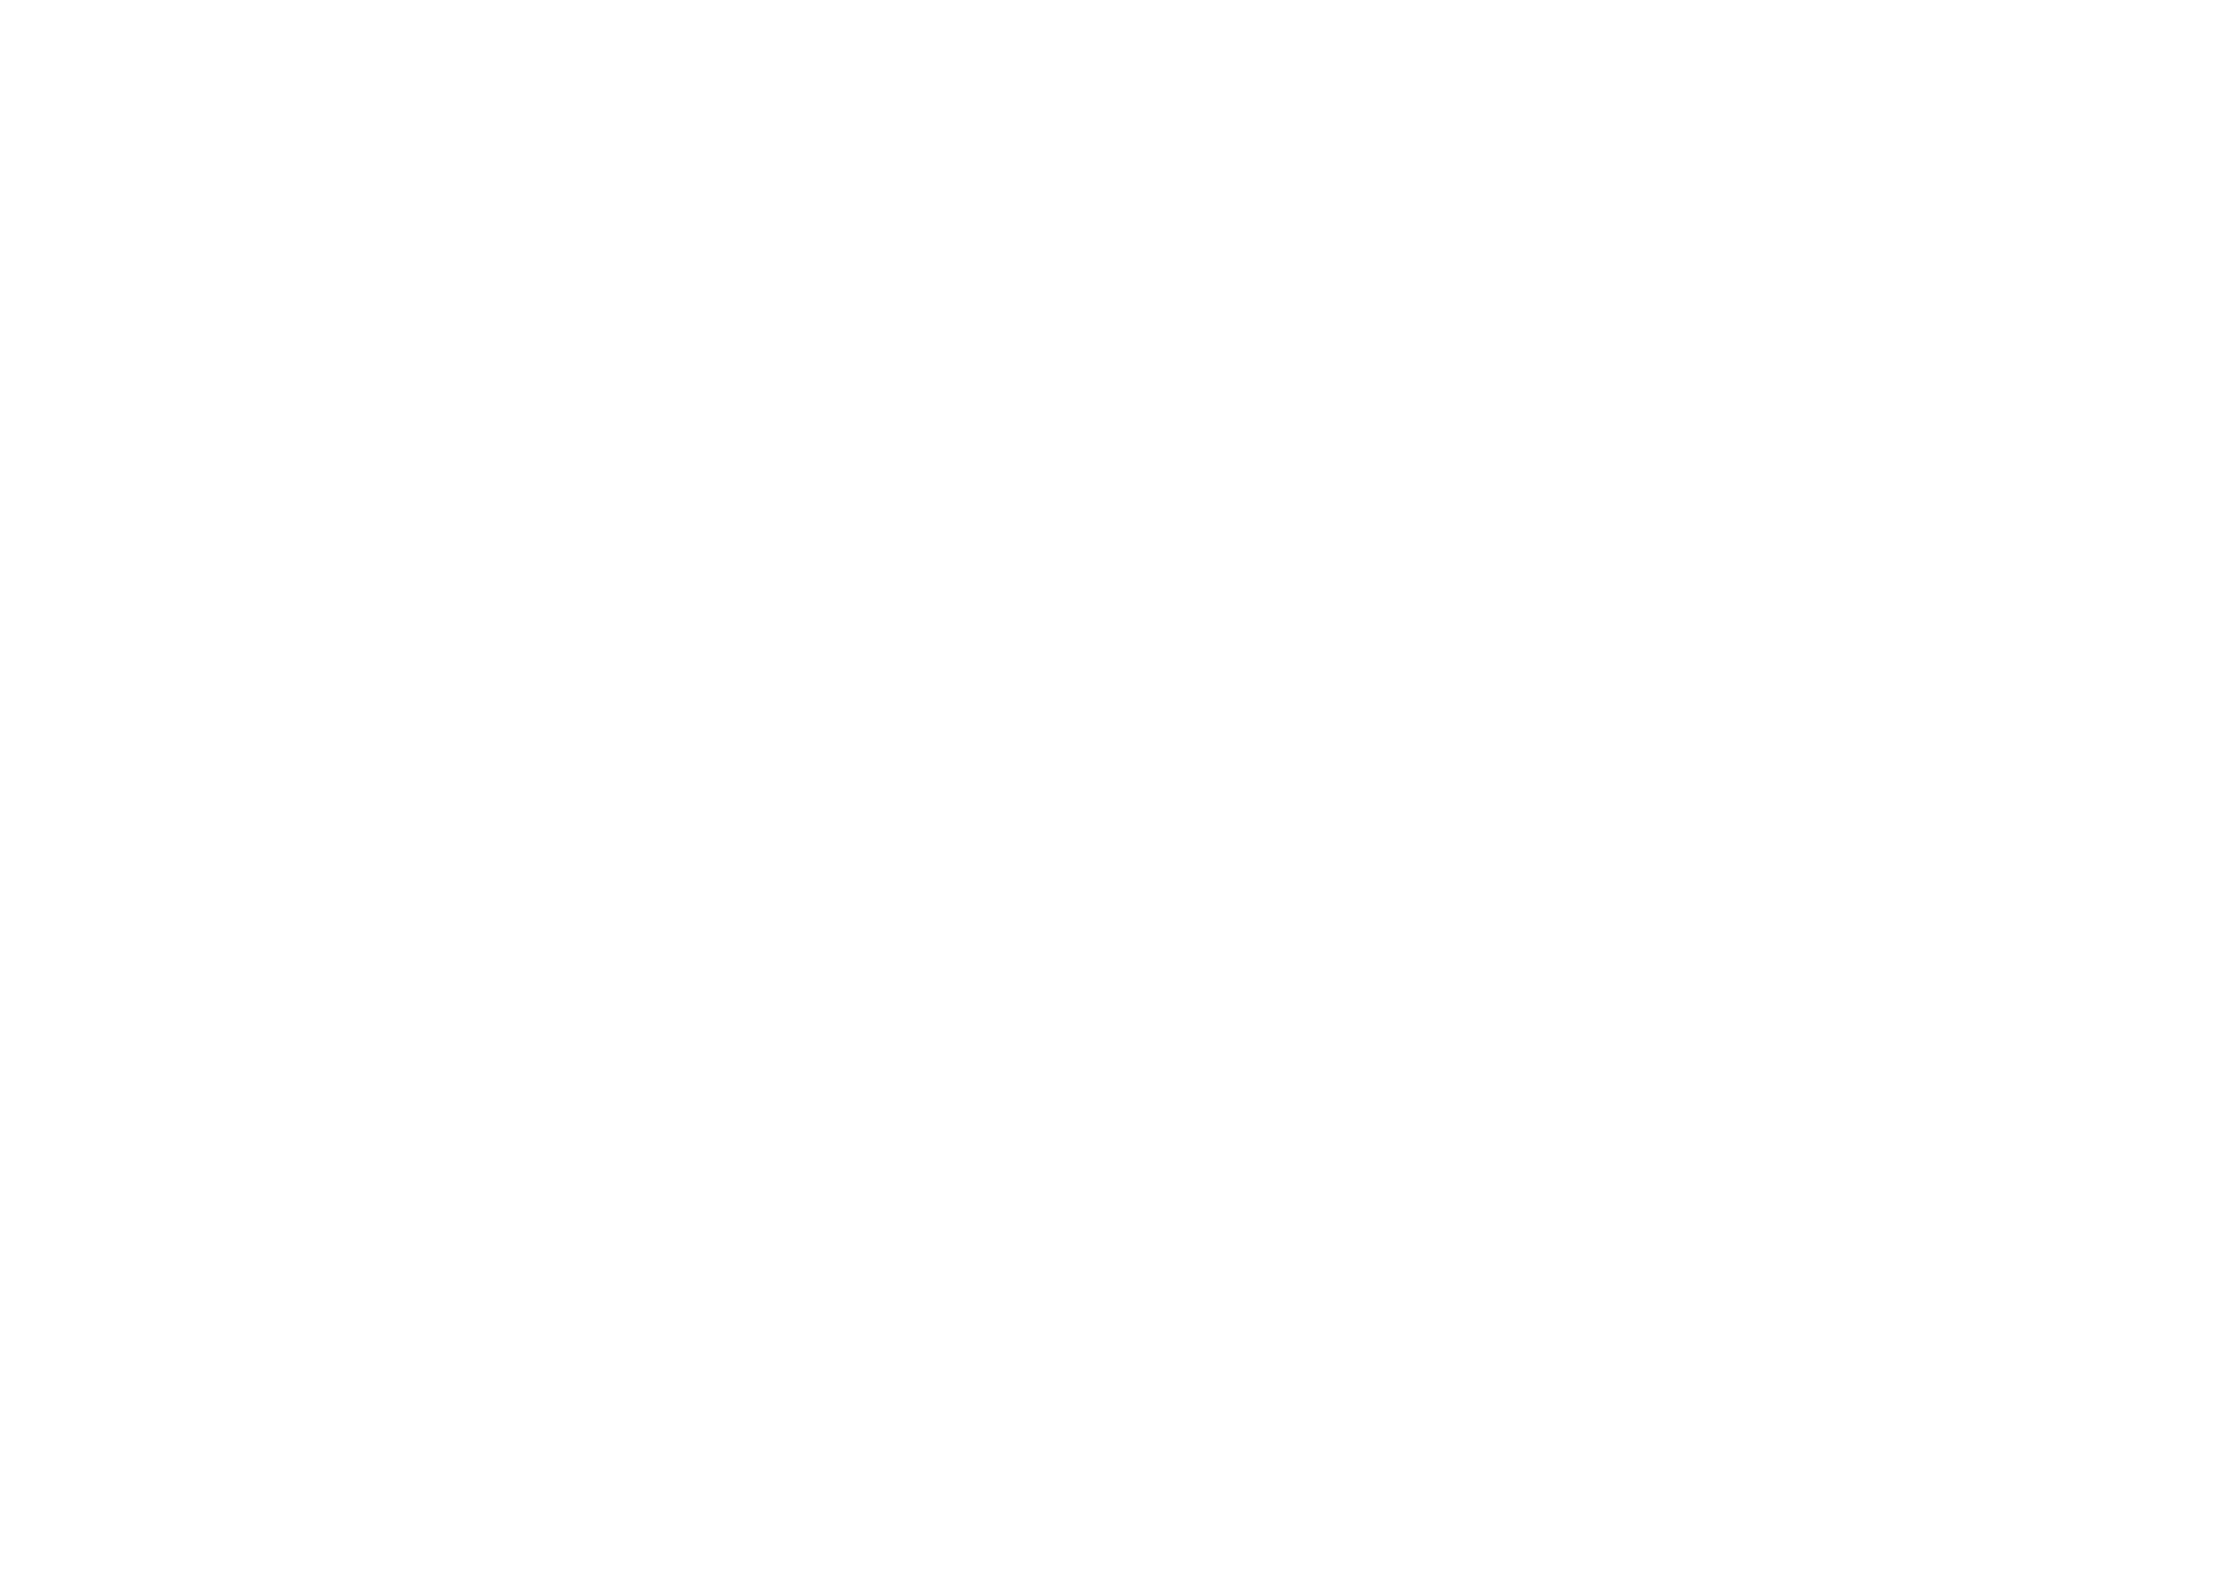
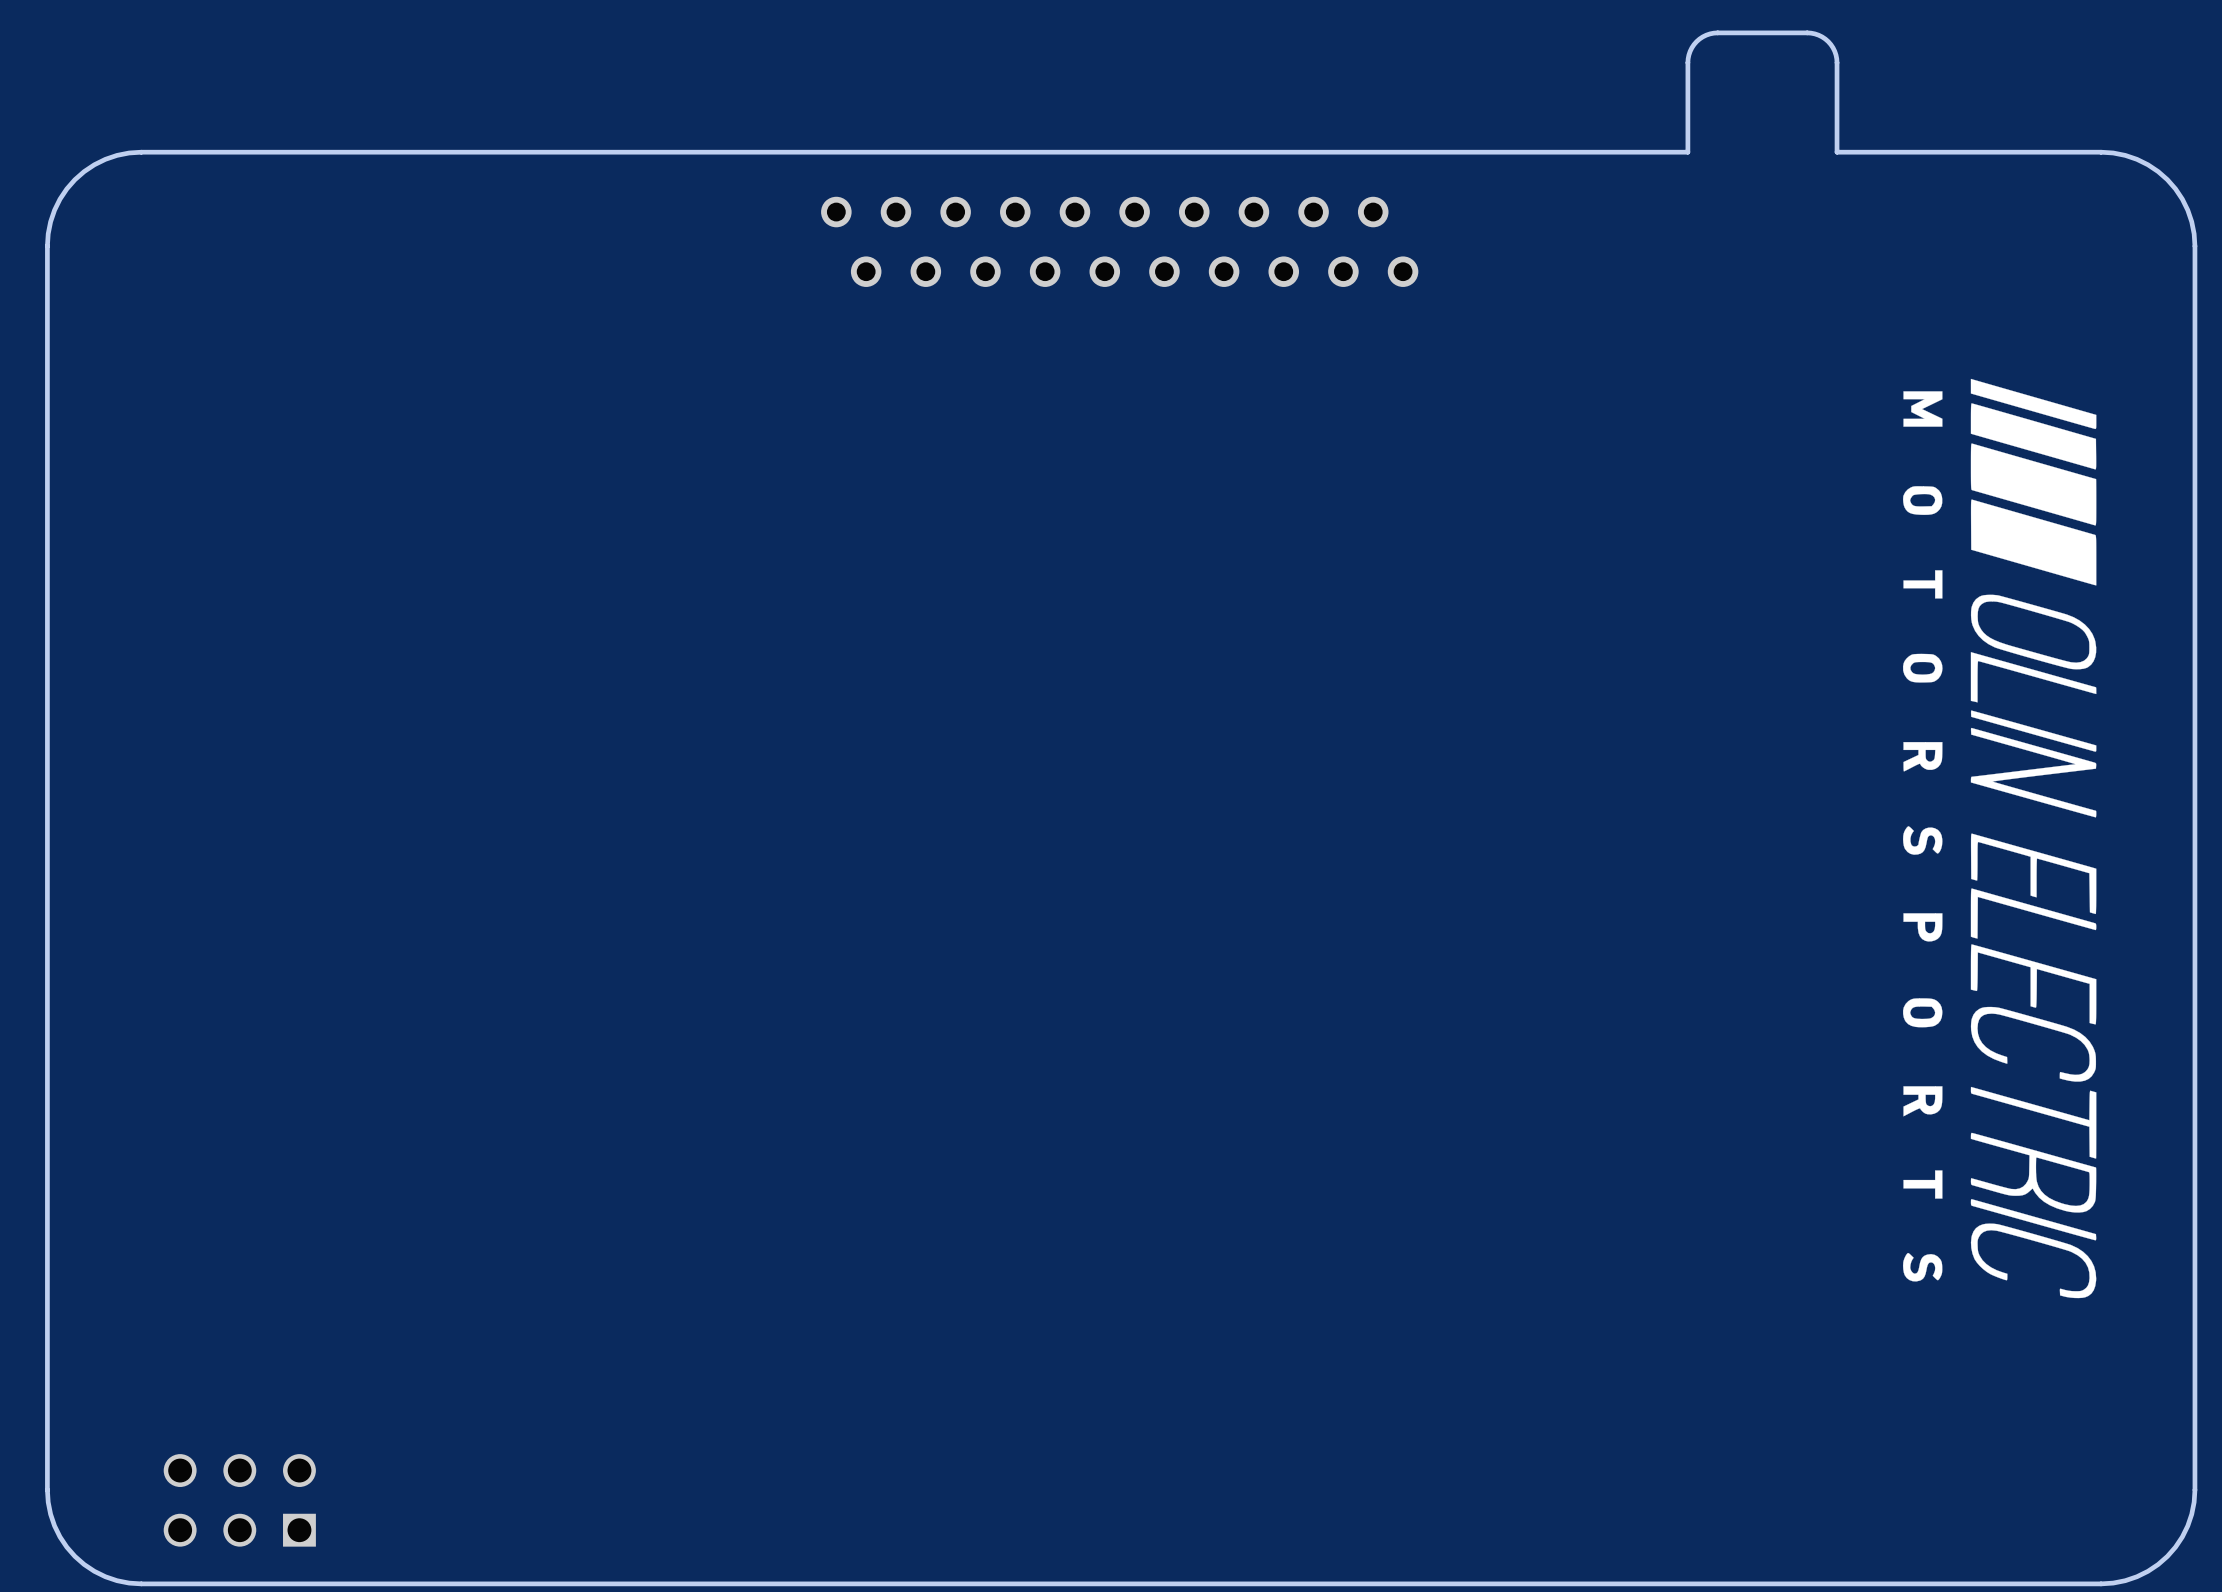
board edge: none -> (1807, 32) (1713, 33) (1706, 35) (1696, 41) (1691, 47) (1688, 58) (1687, 152) (141, 152) (129, 153) (105, 159) (84, 171) (74, 179) (59, 199) (50, 221) (47, 246) (47, 1489) (50, 1514) (54, 1525) (66, 1547) (84, 1564) (105, 1576) (117, 1580) (141, 1583) (2101, 1583) (2125, 1580) (2136, 1576) (2158, 1564) (2175, 1547) (2187, 1525) (2191, 1514) (2194, 1489) (2194, 246) (2191, 221) (2182, 199) (2167, 179) (2147, 164) (2136, 159) (2113, 153) (1837, 152) (1836, 54) (1833, 47) (1825, 39) (1818, 35) (1807, 32)
part: none -> (1119, 241)
drawing: none -> [1902, 378, 2097, 1299]
part: none -> (239, 1500)

